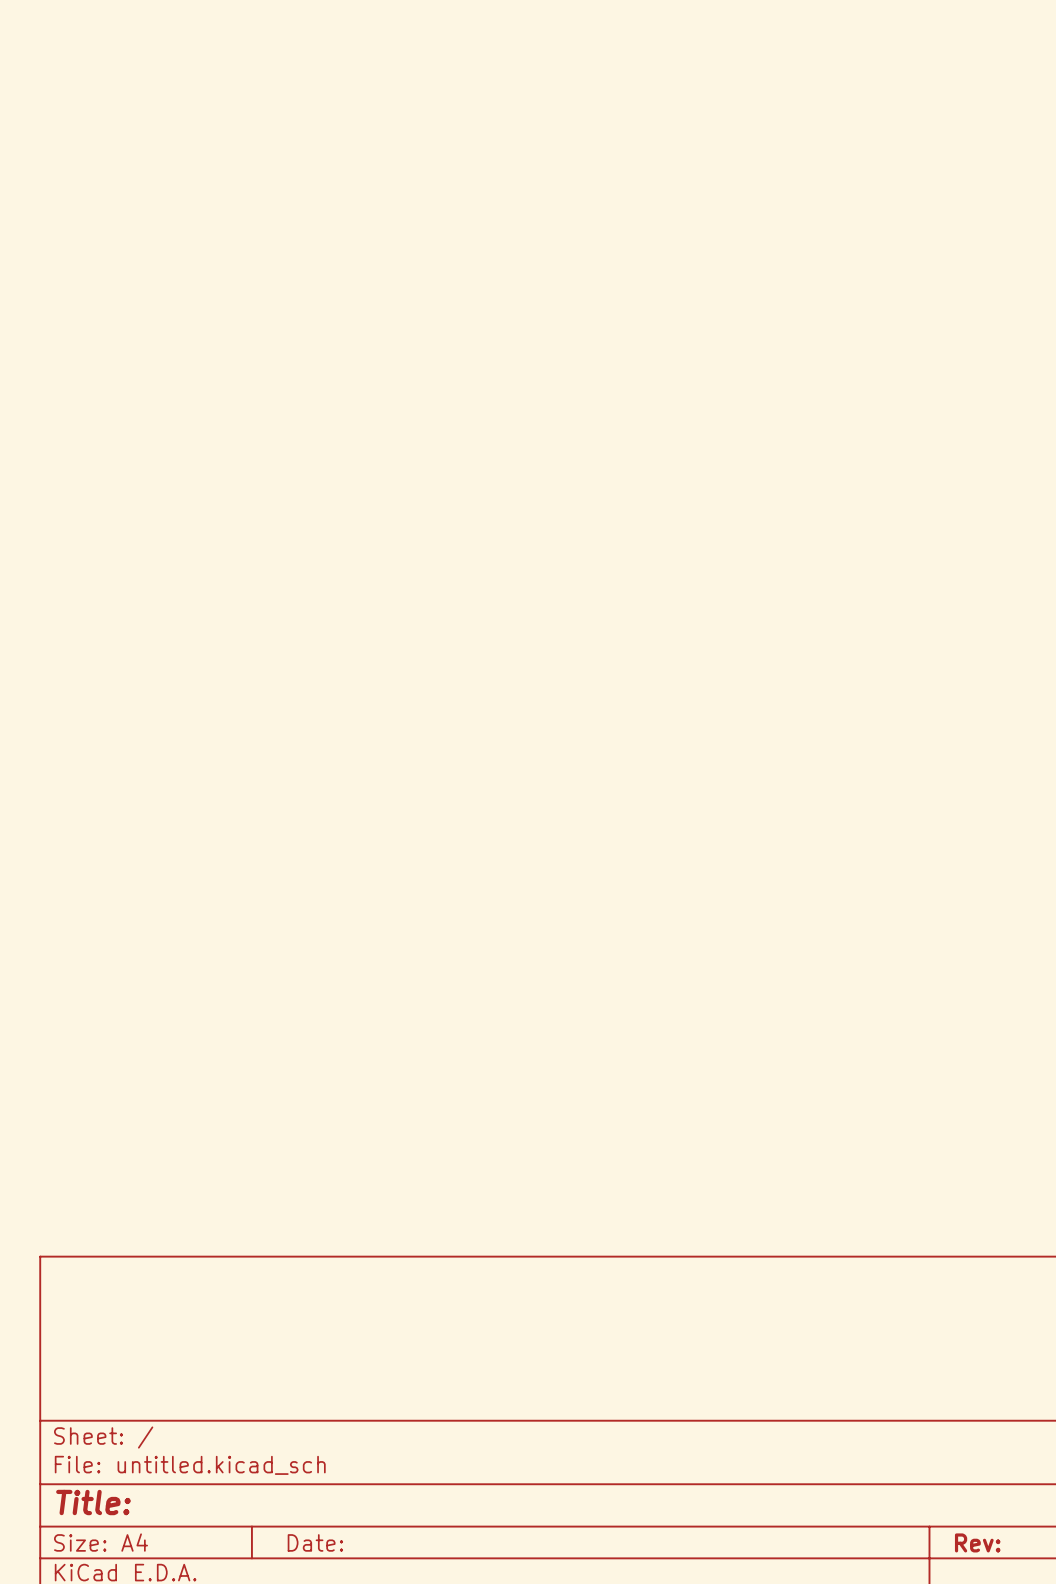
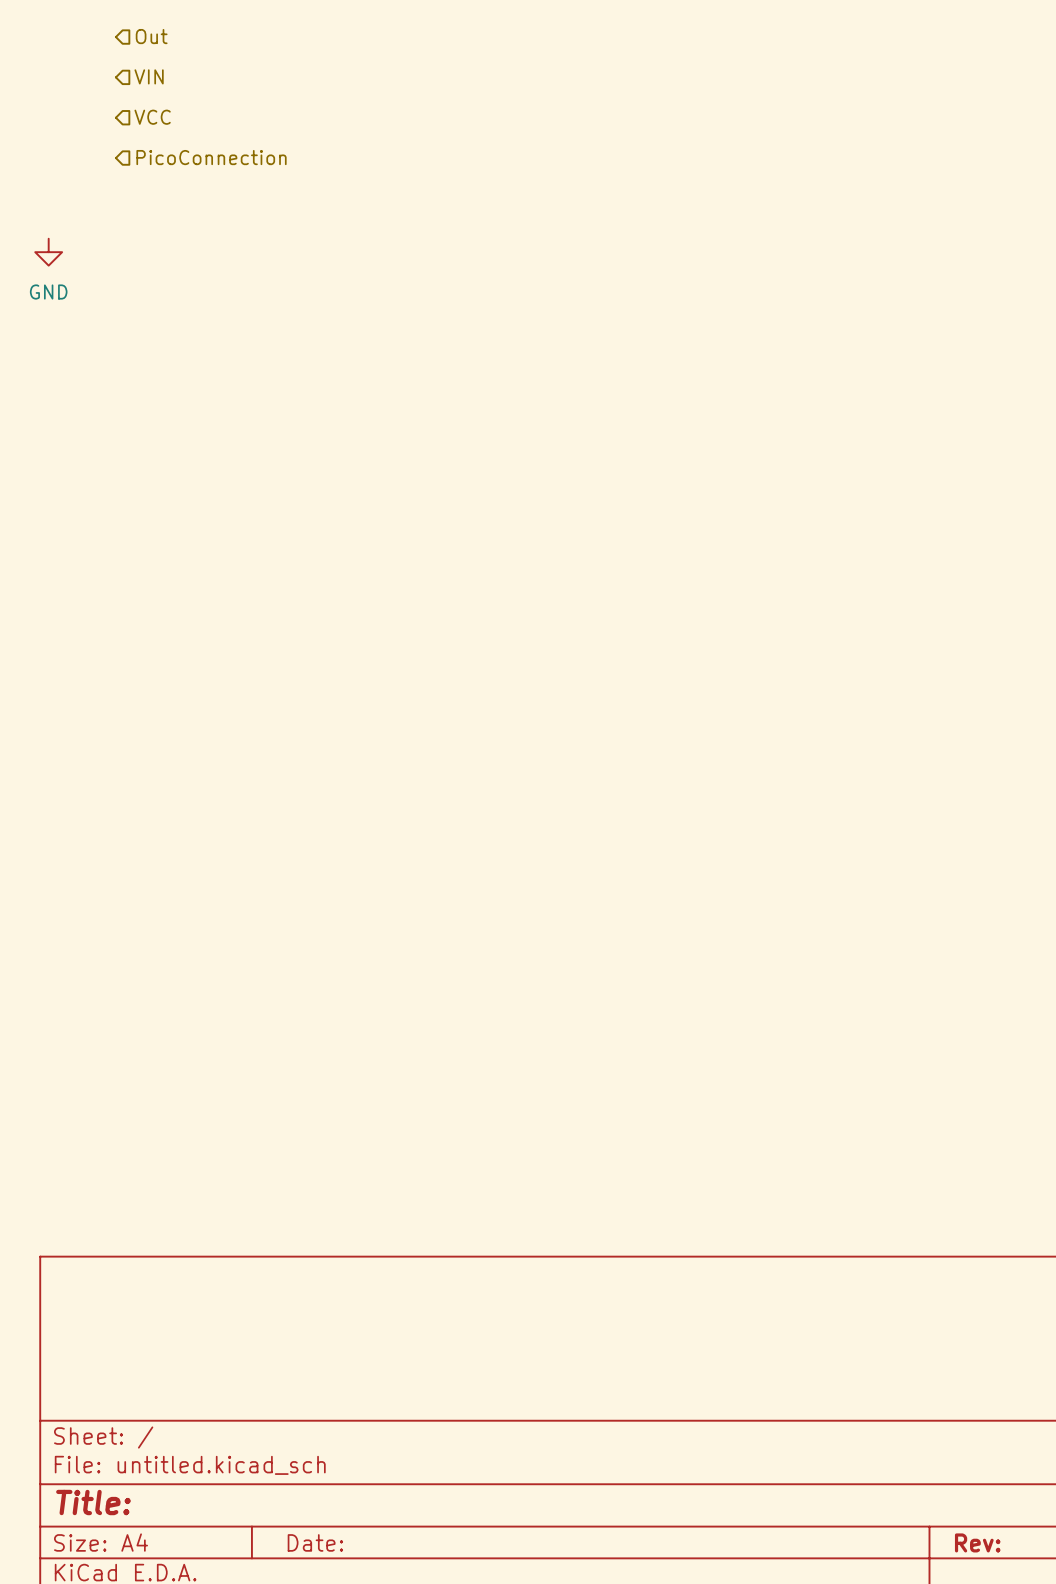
hierarchical label: none -> Out (151, 36)
hierarchical label: none -> VIN (149, 76)
hierarchical label: none -> VCC (152, 117)
hierarchical label: none -> PicoConnection (211, 157)
power symbol: none -> GND (48, 252)

